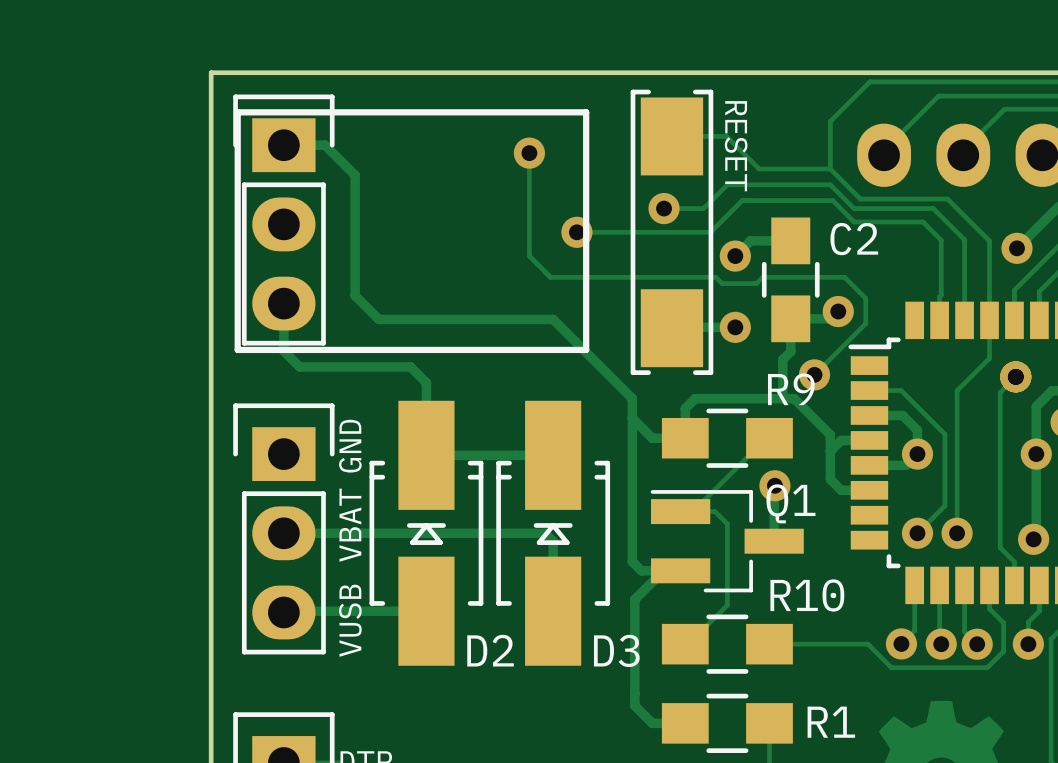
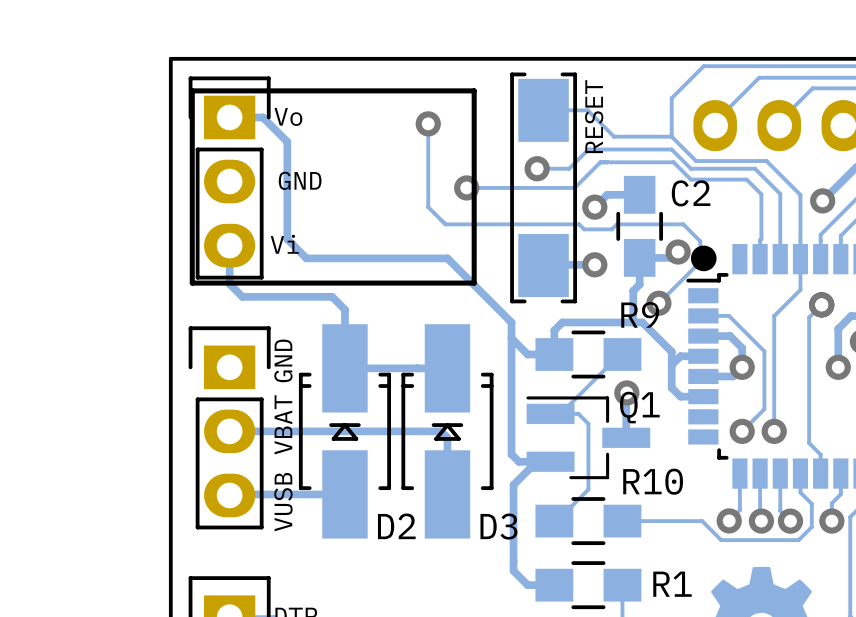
text: none -> Vo (288, 116)
text: none -> RESET (594, 116)
part value: RESET (736, 146) -> none
text: none -> GND (300, 180)
text: none -> Vi (284, 244)
drawing: none -> [690, 245, 717, 272]
track: (1036, 454) (1036, 536) (1033, 539) -> none
via: (1033, 539) -> none

